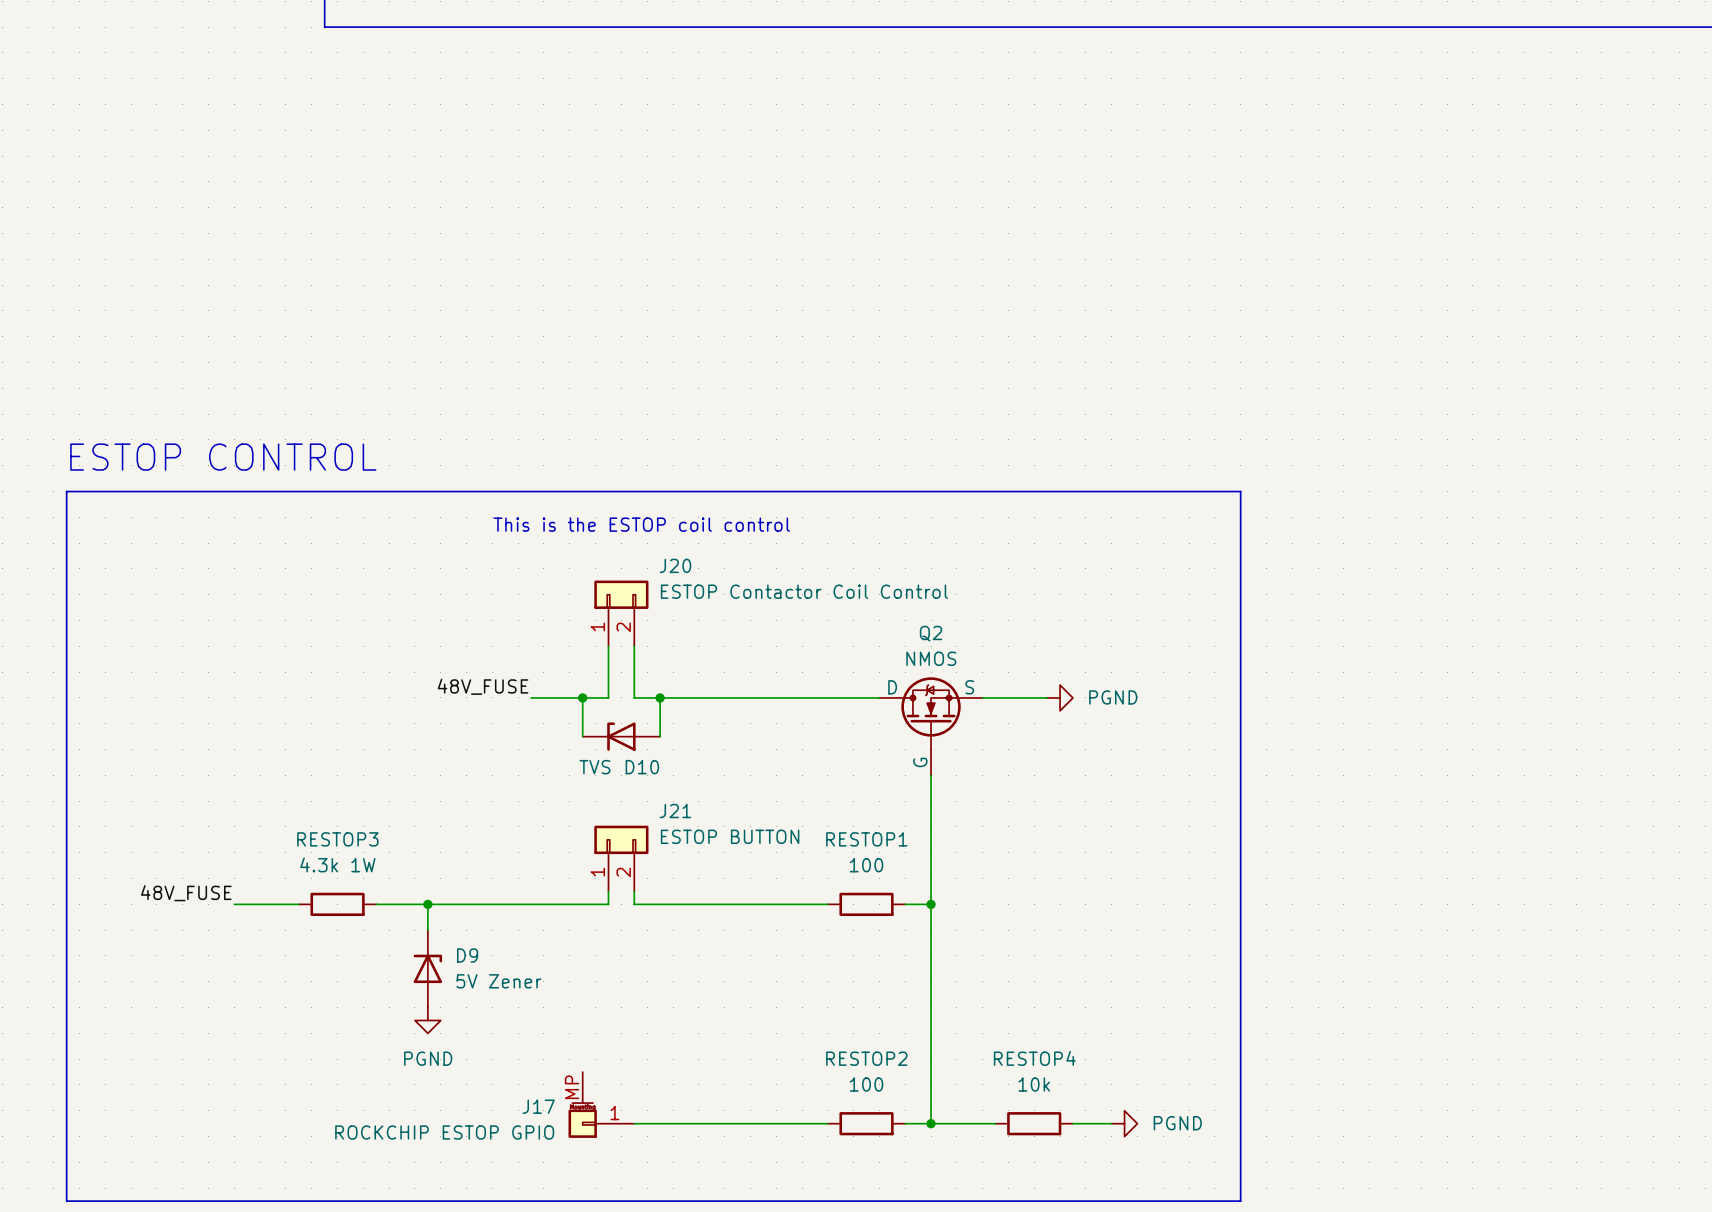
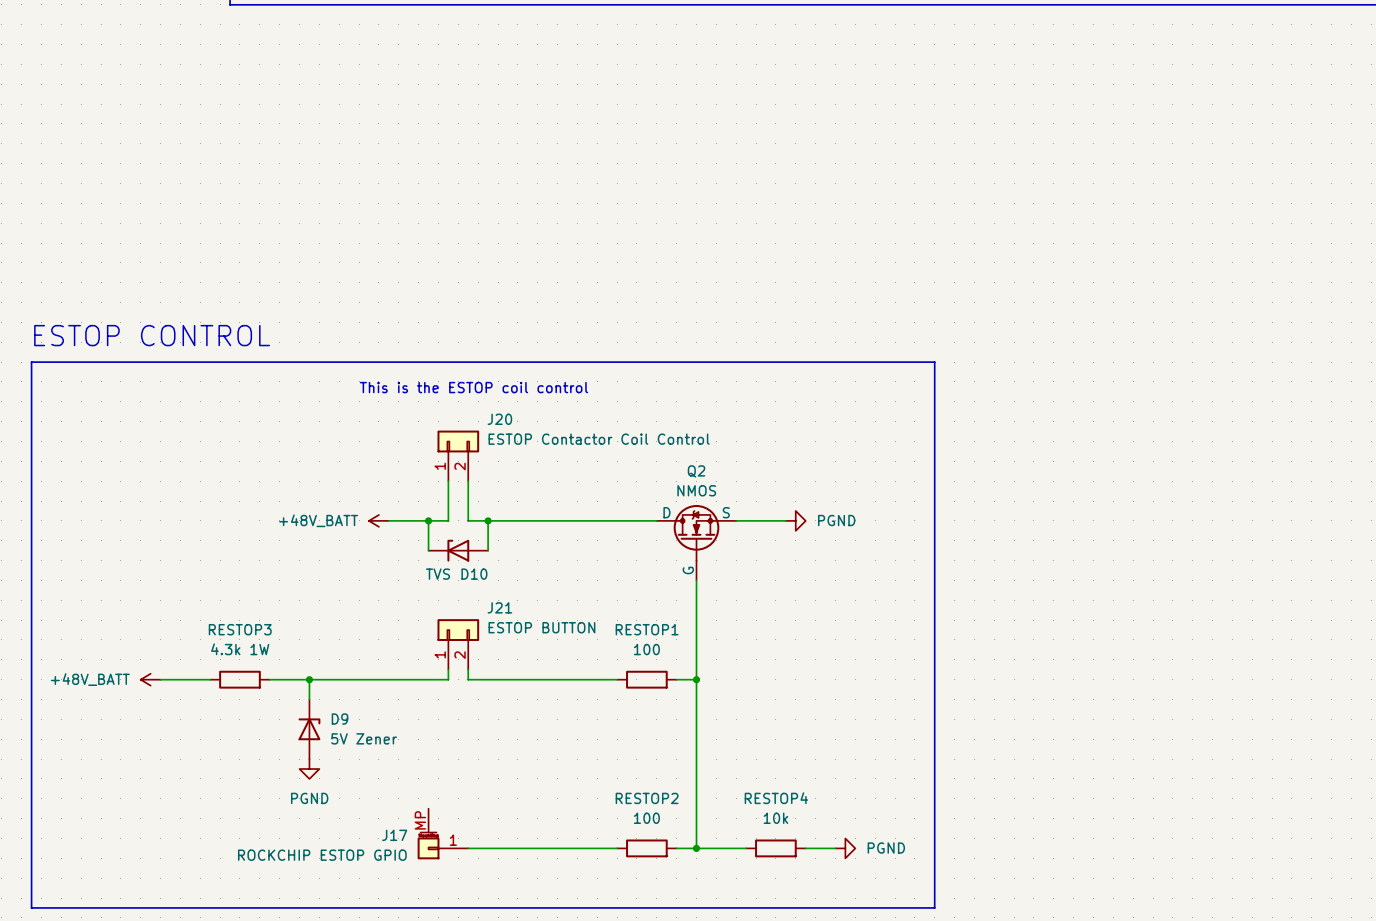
label: 48V_FUSE (483, 686) -> none
power symbol: none -> +48V_BATT (378, 520)
label: 48V_FUSE (186, 893) -> none
power symbol: none -> +48V_BATT (150, 679)

